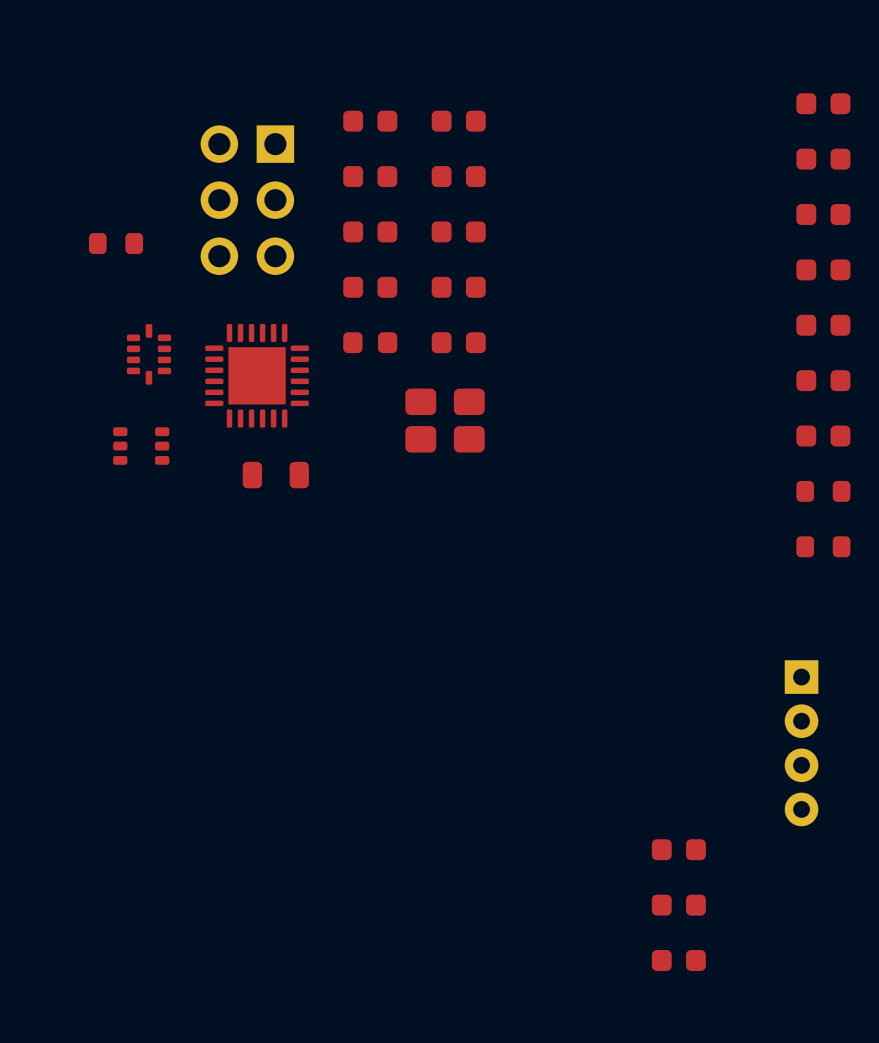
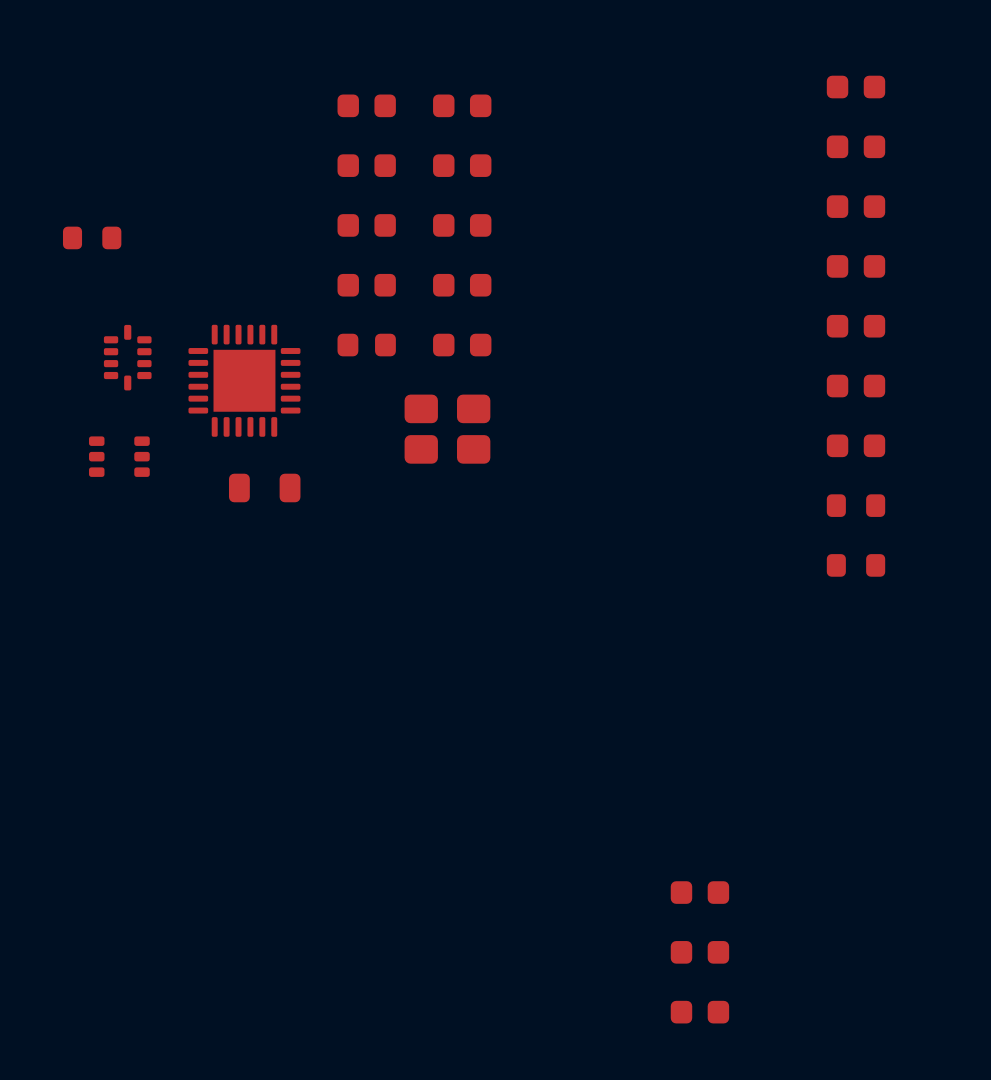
part: (247, 200) -> none
part: (801, 743) -> none

